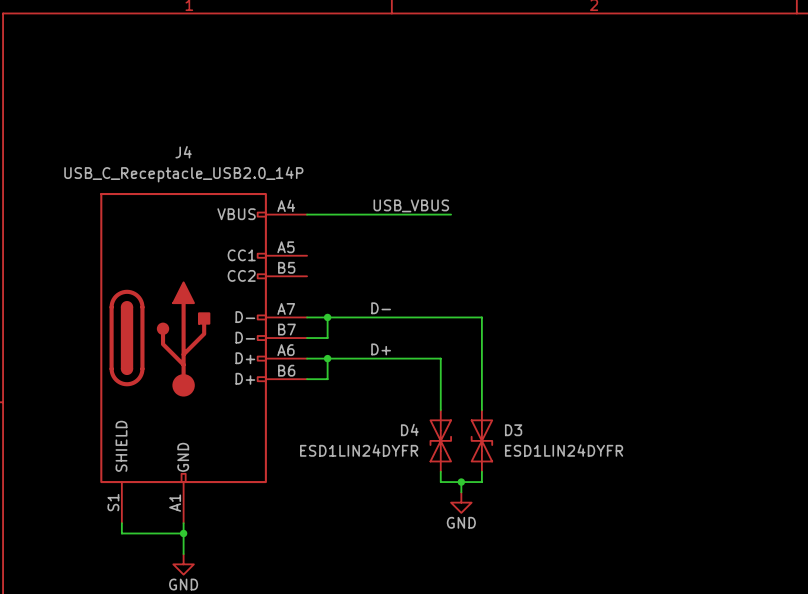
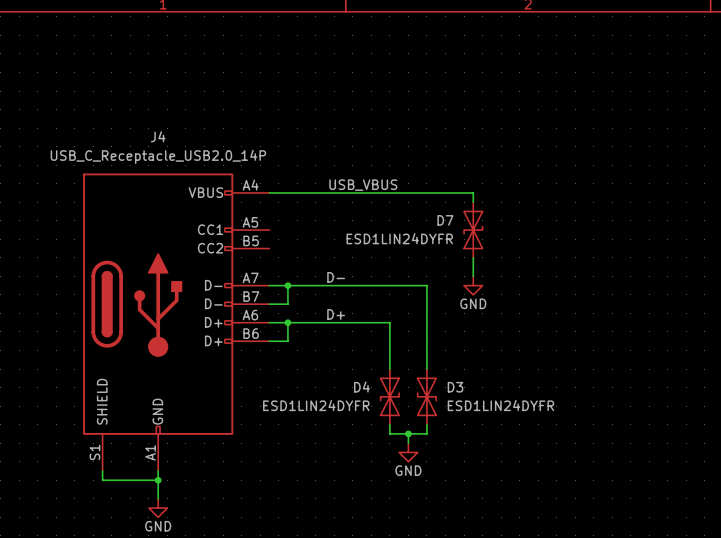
wire: none -> (399, 192) (473, 192) (473, 202)
D7: none -> ESD1LIN24DYFR (473, 230)
wire: none -> (473, 257) (473, 276)
power symbol: none -> GND (473, 285)

